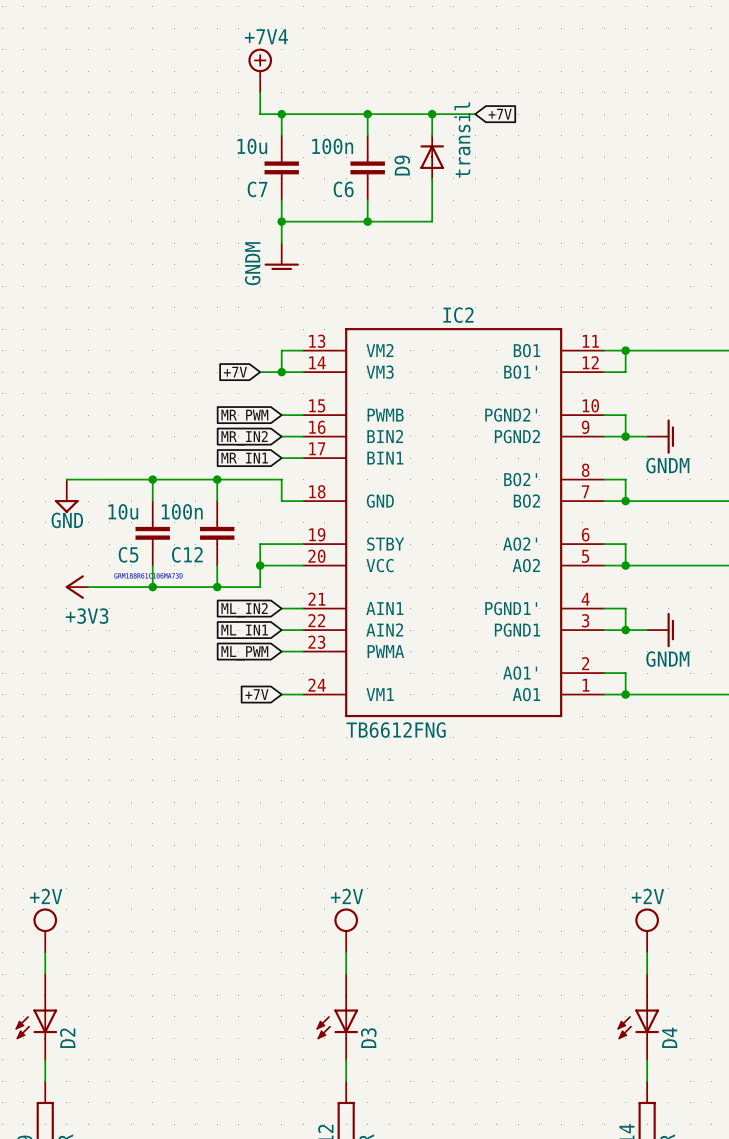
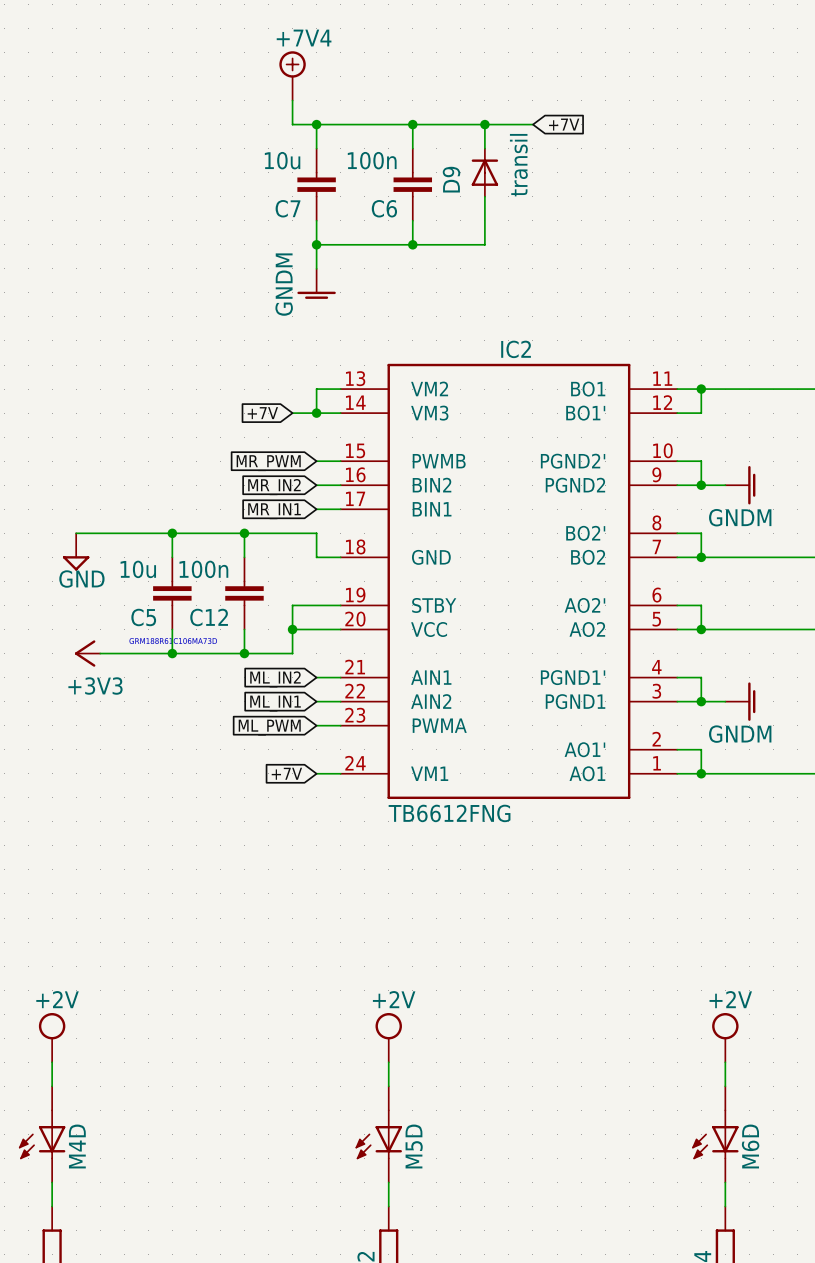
D4 name: D4 (669, 1037) -> M6D (750, 1146)
D2 name: D2 (67, 1038) -> M4D (77, 1146)
D3 name: D3 (368, 1038) -> M5D (414, 1146)

